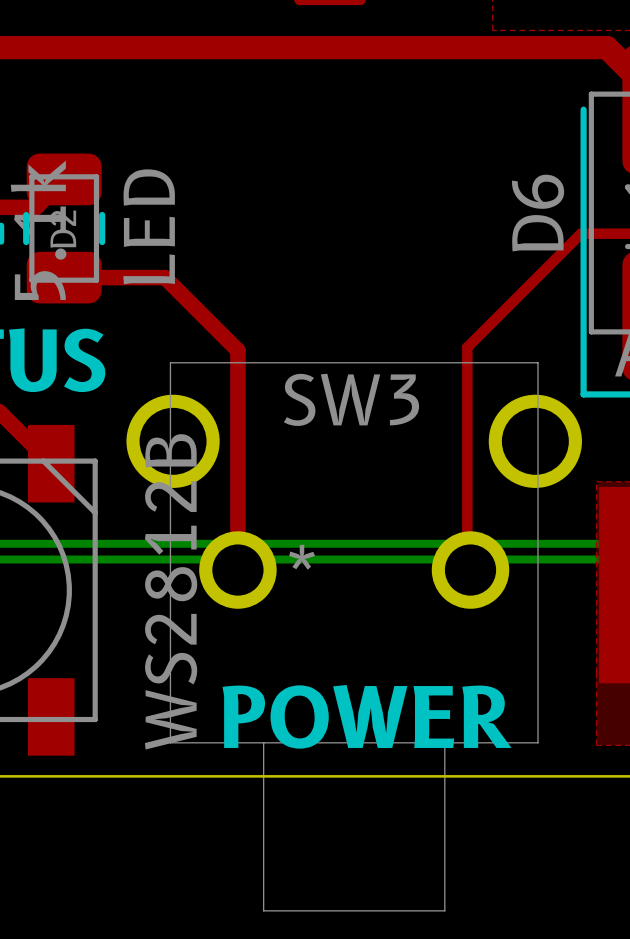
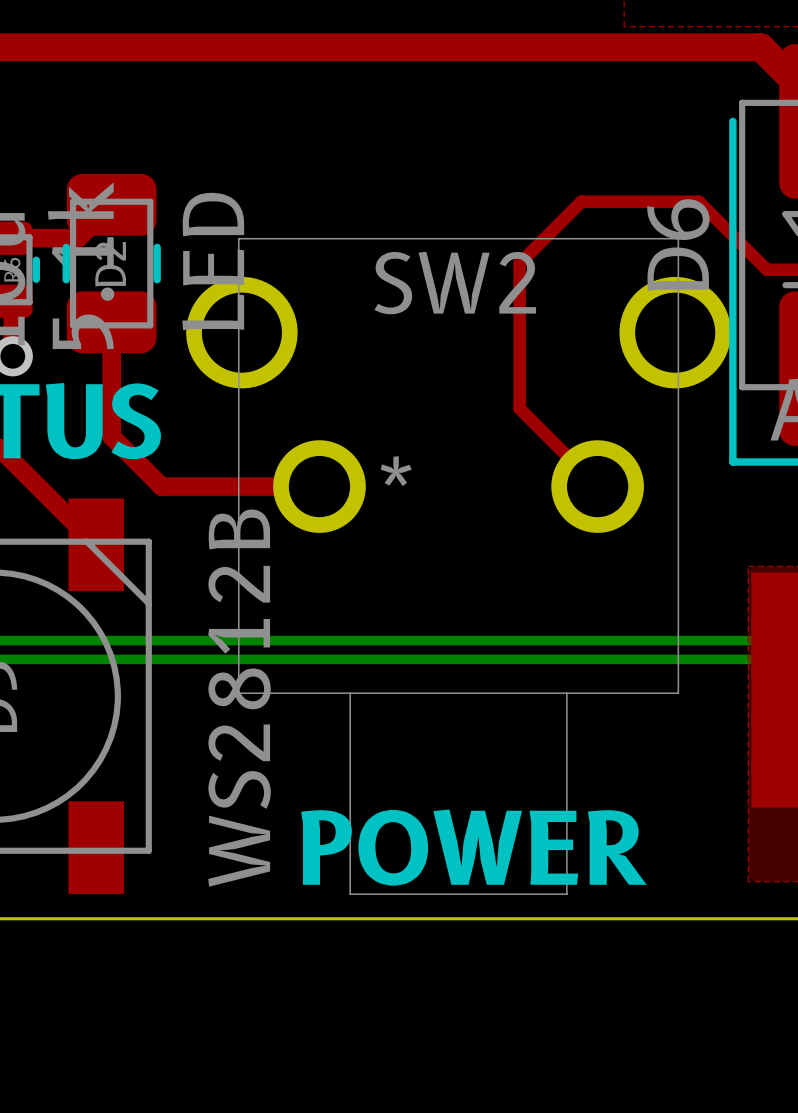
top track: (612, 233) (581, 233) (467, 347) (467, 566) (470, 570) -> (766, 269) (698, 201) (581, 201) (519, 263) (519, 408) (597, 486)
top track: (64, 277) (164, 277) (237, 350) (237, 570) -> (111, 322) (111, 436) (161, 486) (319, 486)
SW2: none -> (458, 566)
SW3: (354, 636) -> none

